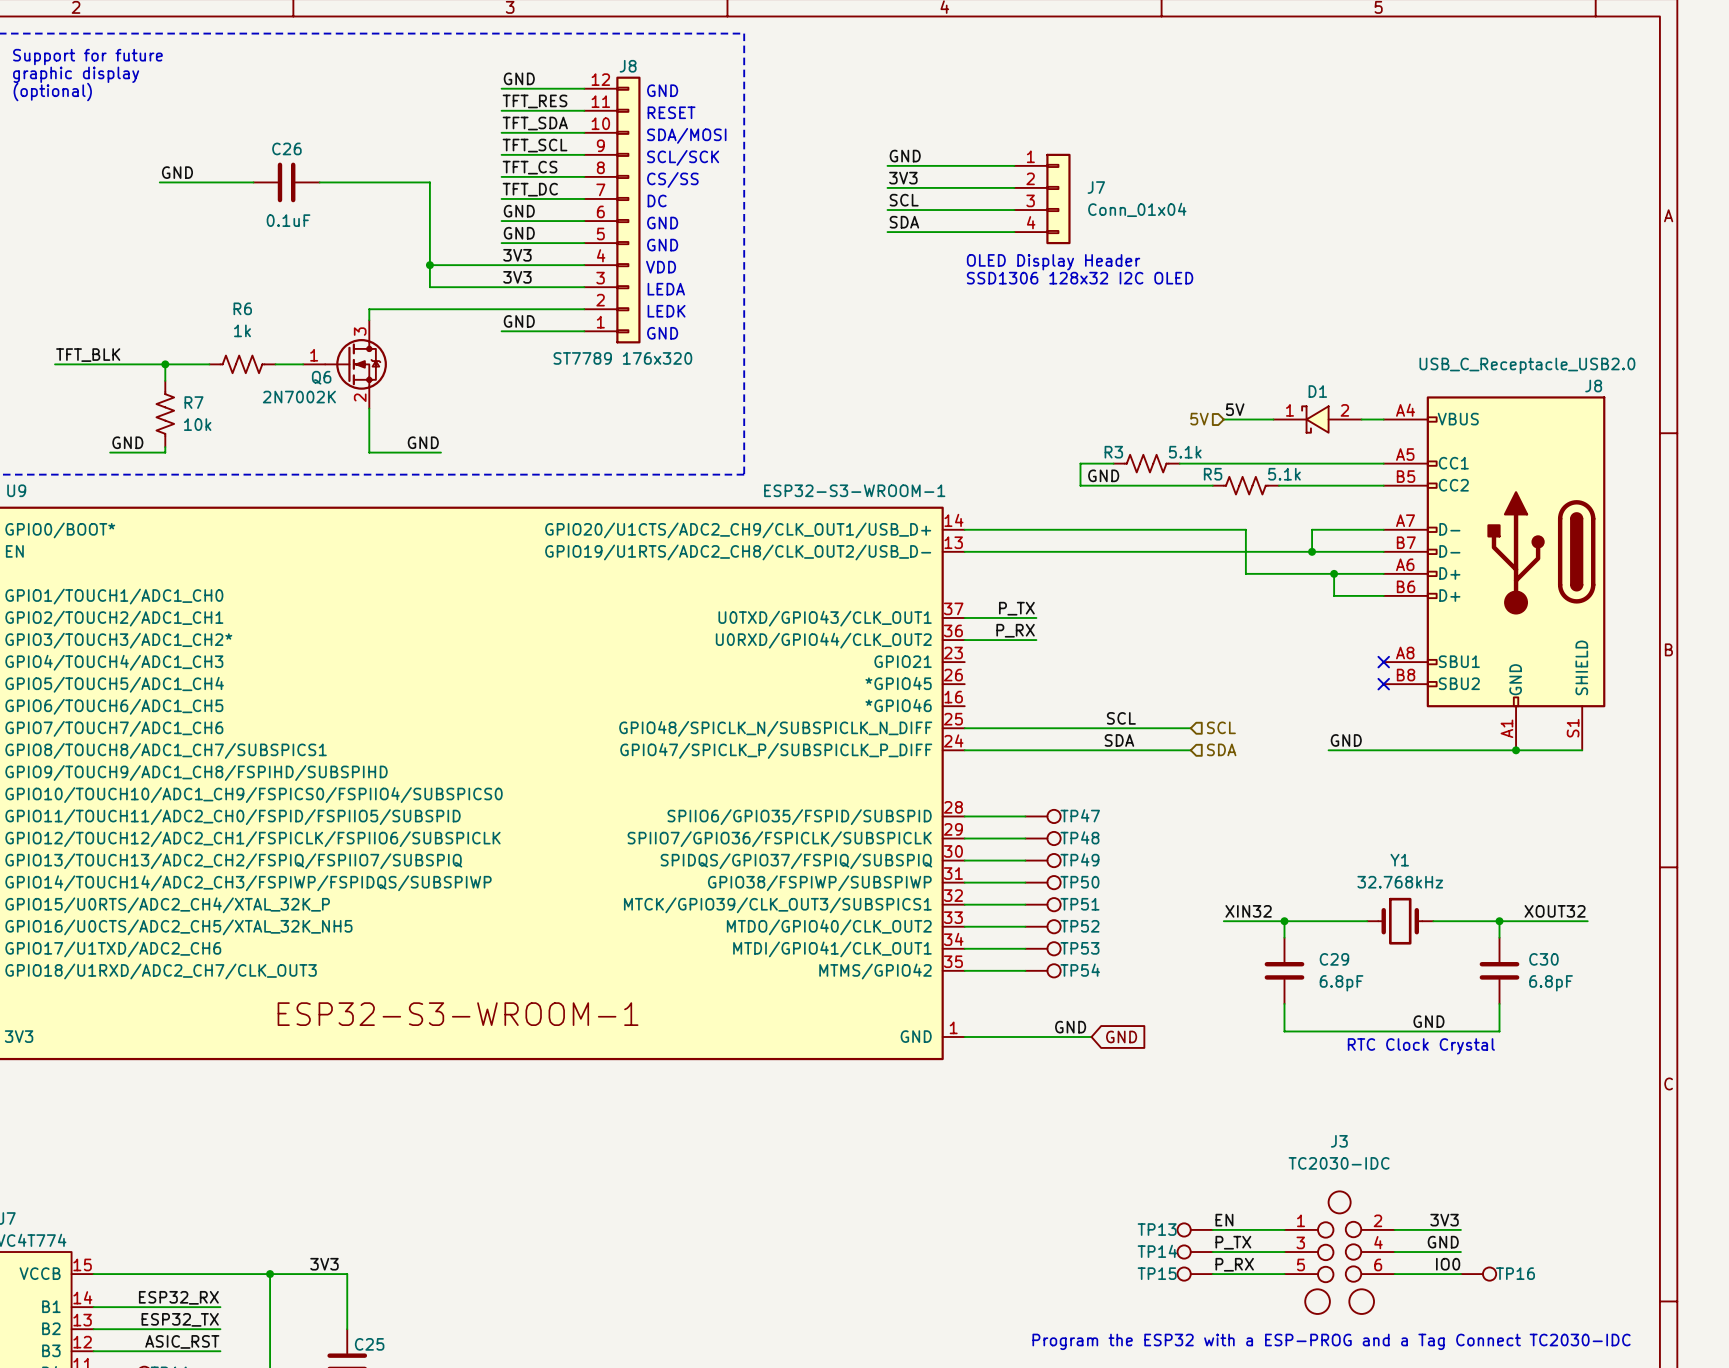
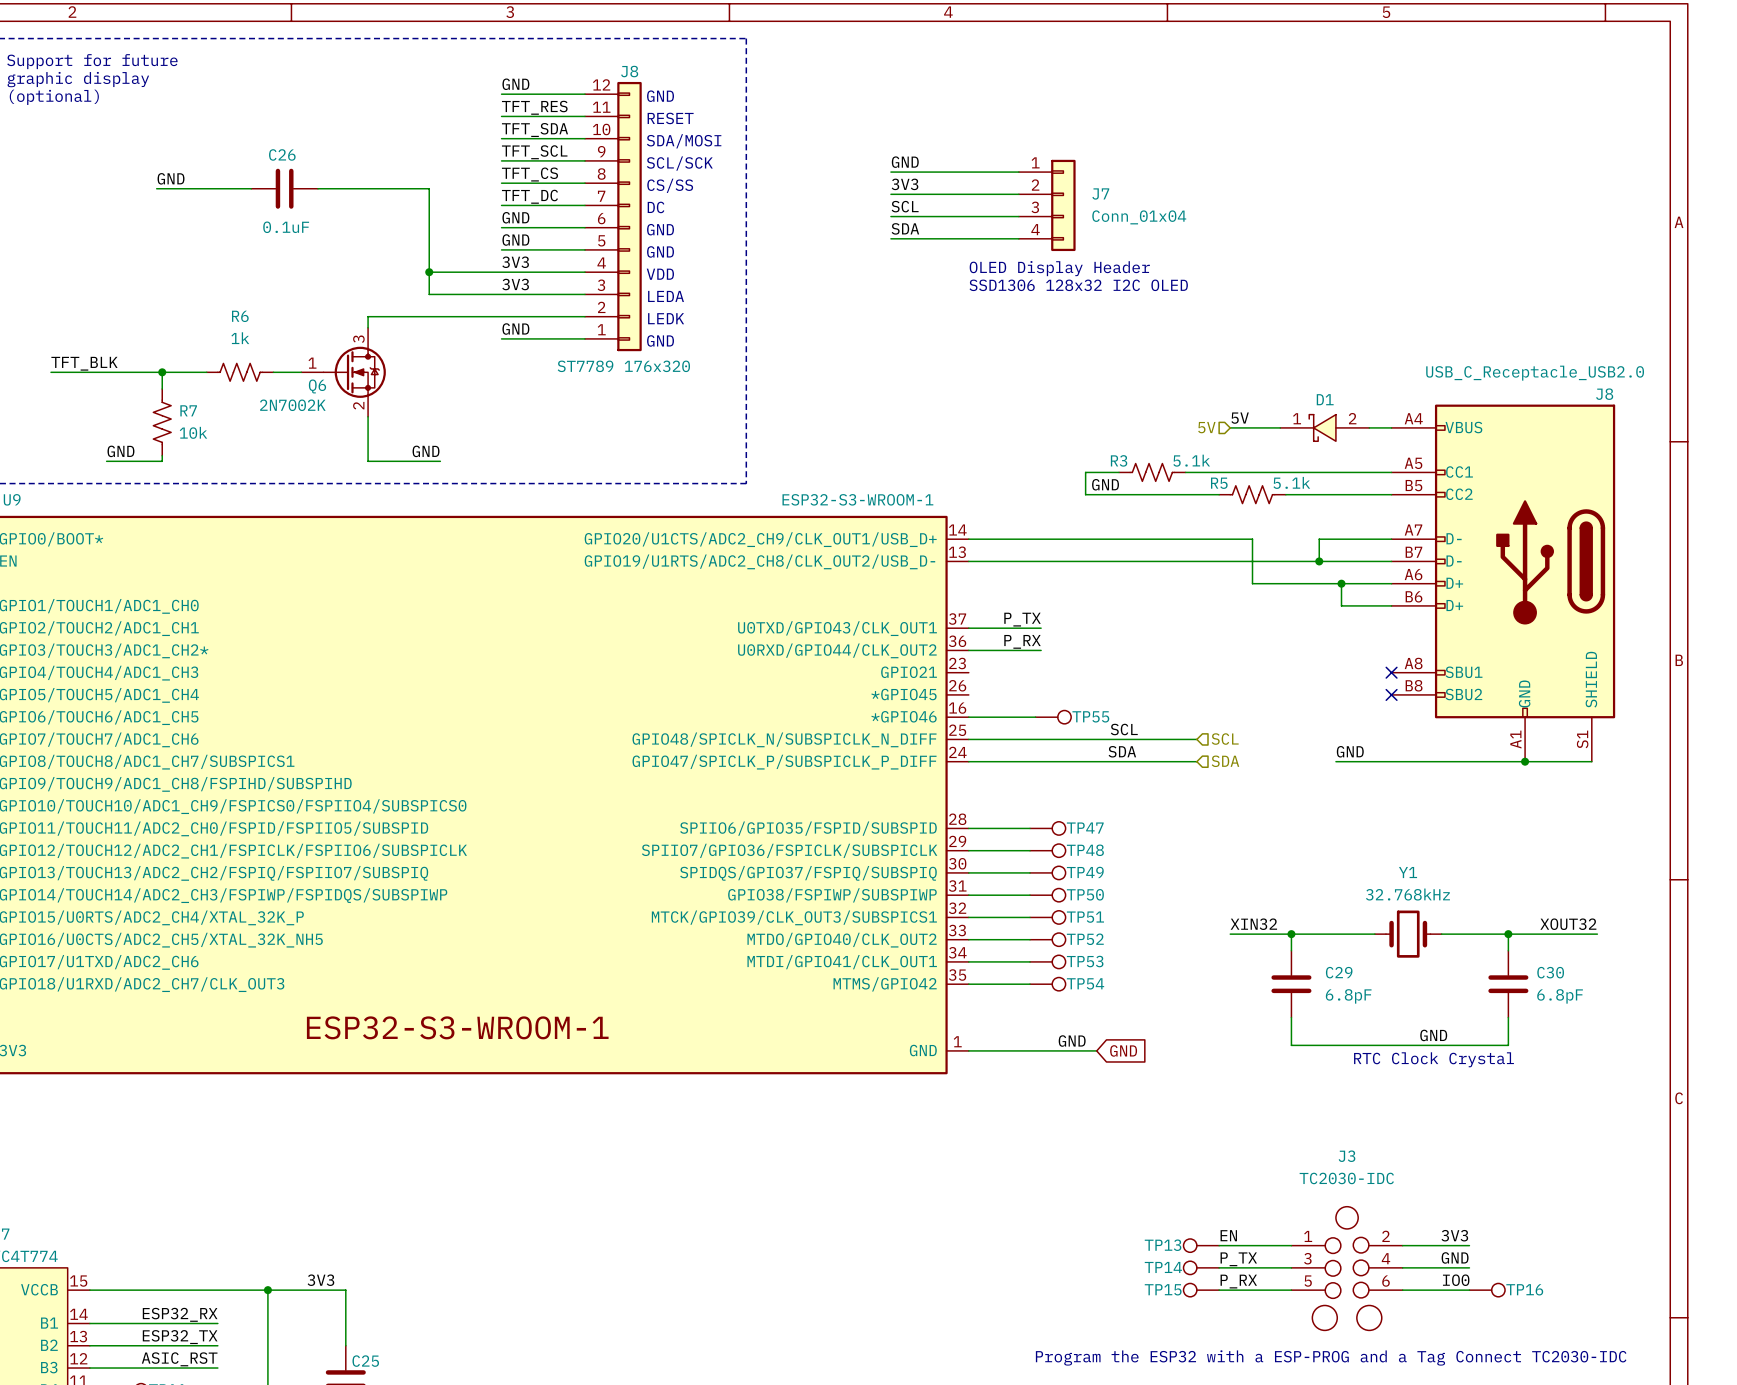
wire: none -> (968, 717) (1035, 717)
TP55: none -> (1053, 717)

